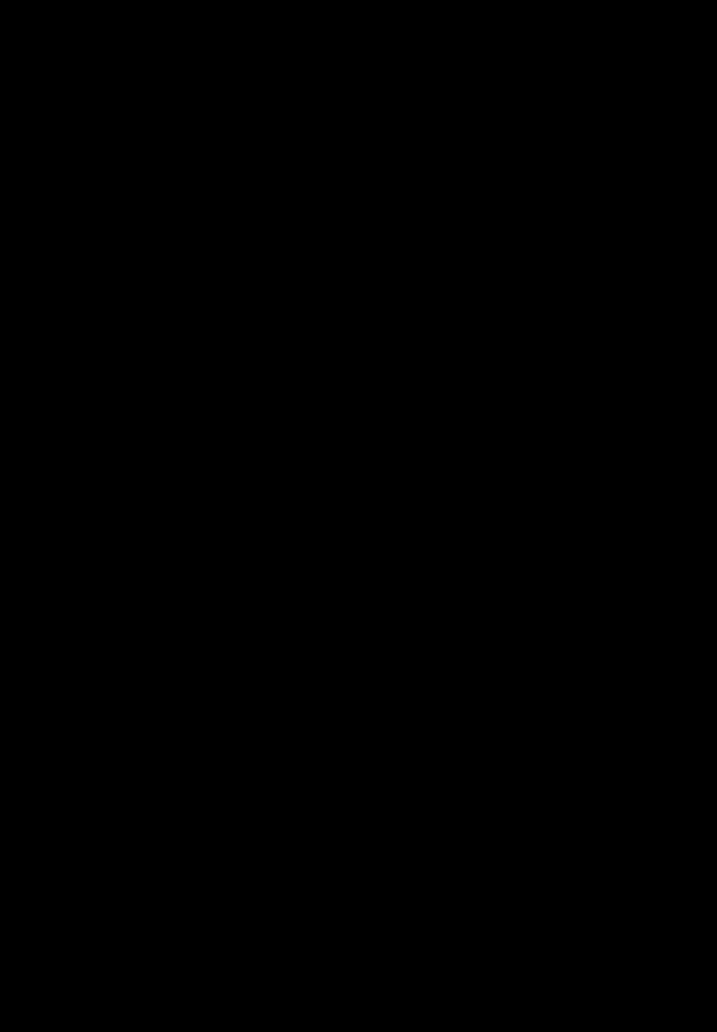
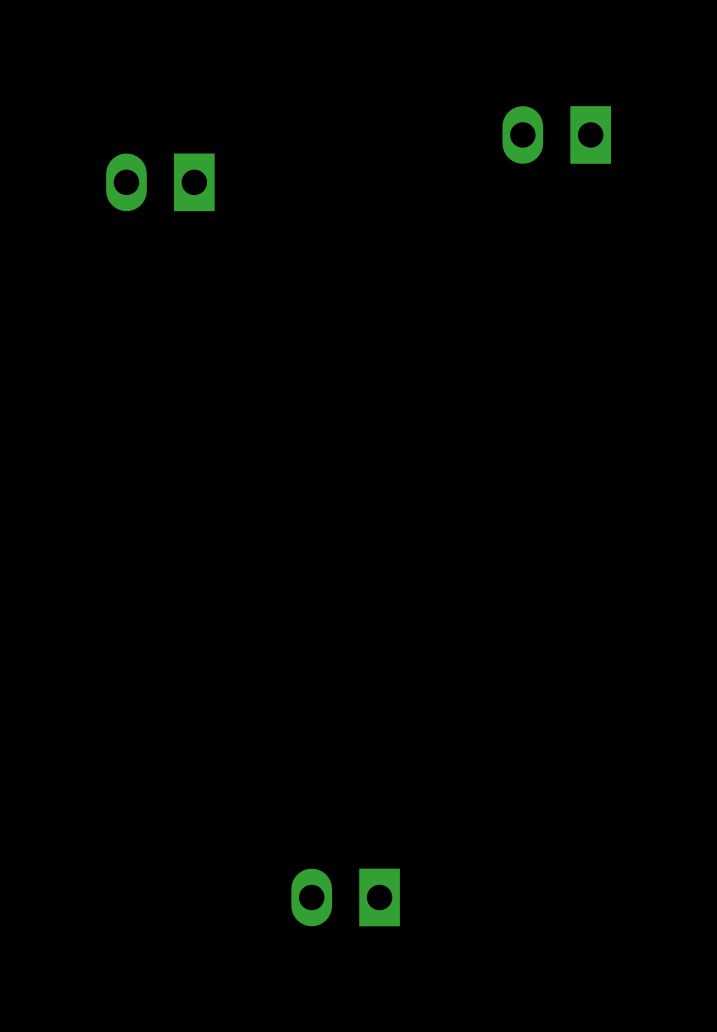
part: none -> (556, 134)
part: none -> (160, 182)
part: none -> (345, 897)

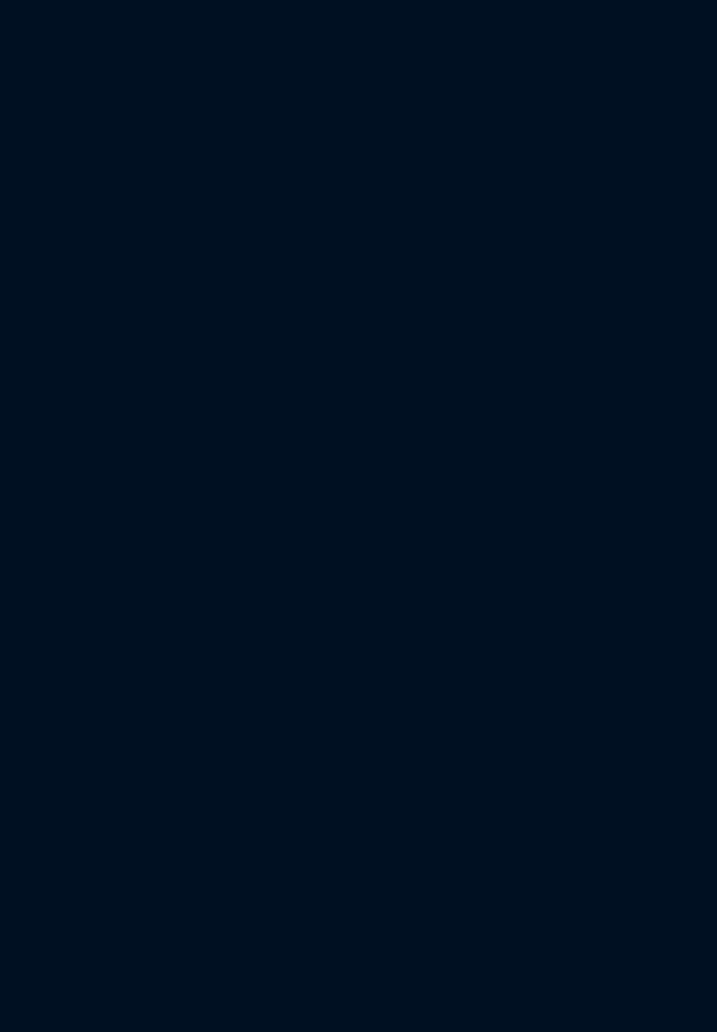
part: (556, 134) -> none
part: (160, 182) -> none
part: (345, 897) -> none

